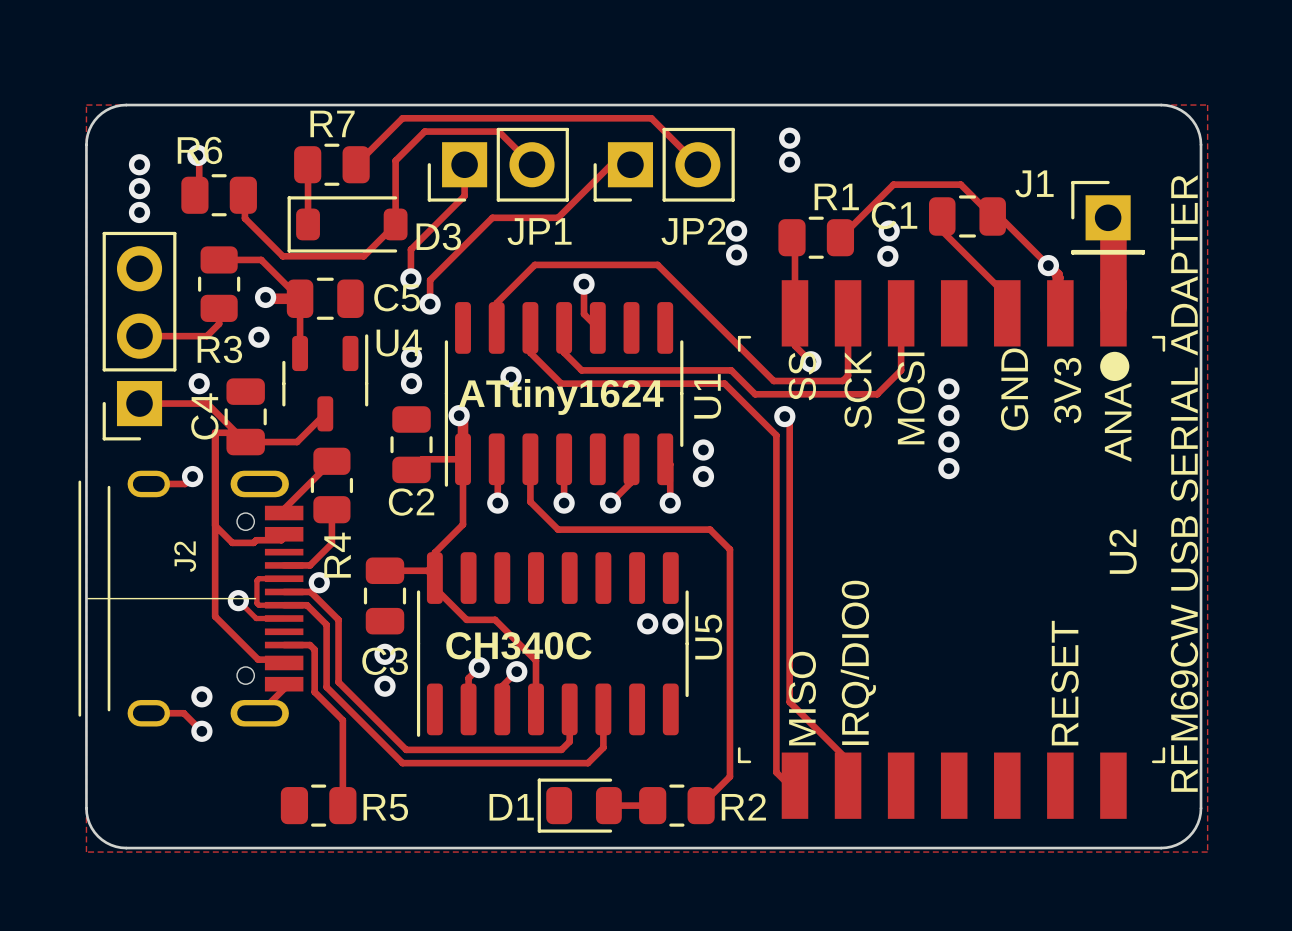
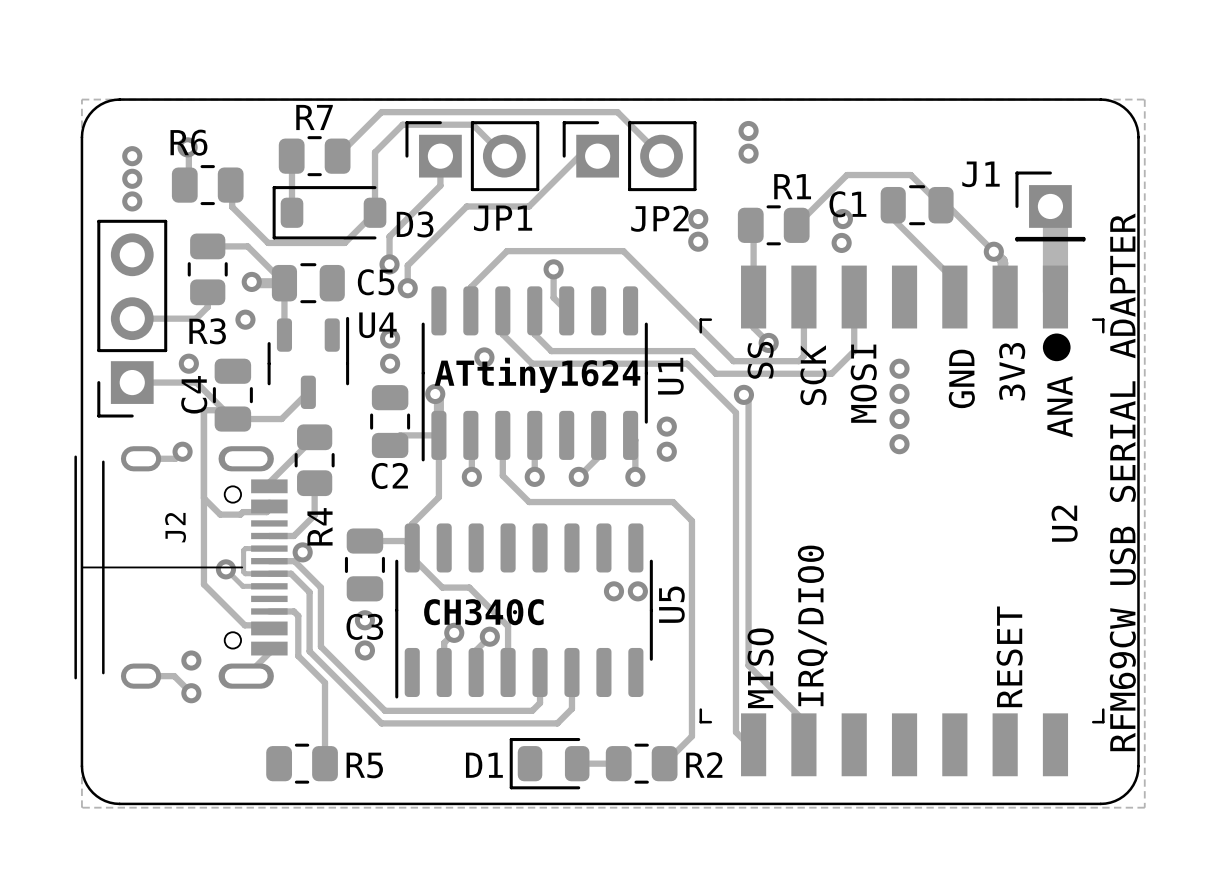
JP1 footprint: [427, 127, 569, 202] -> [405, 121, 540, 192]
JP2 footprint: [593, 127, 735, 202] -> [562, 121, 697, 192]

